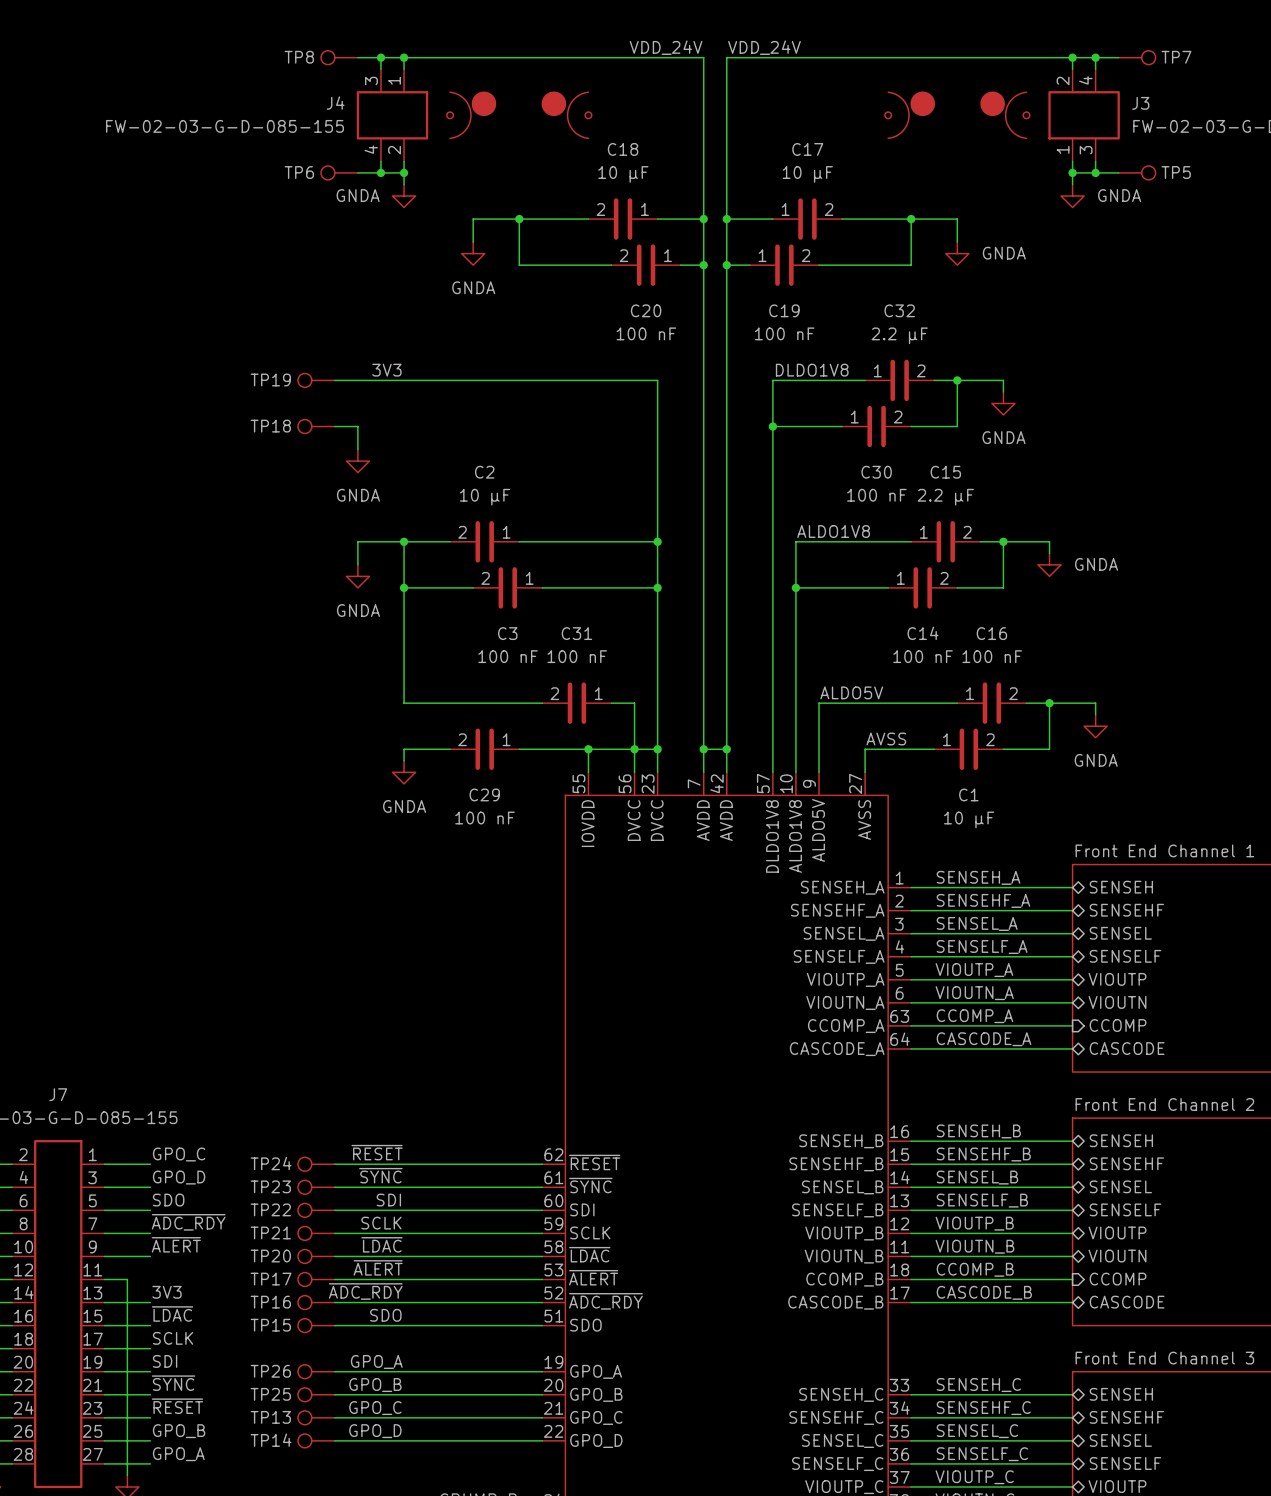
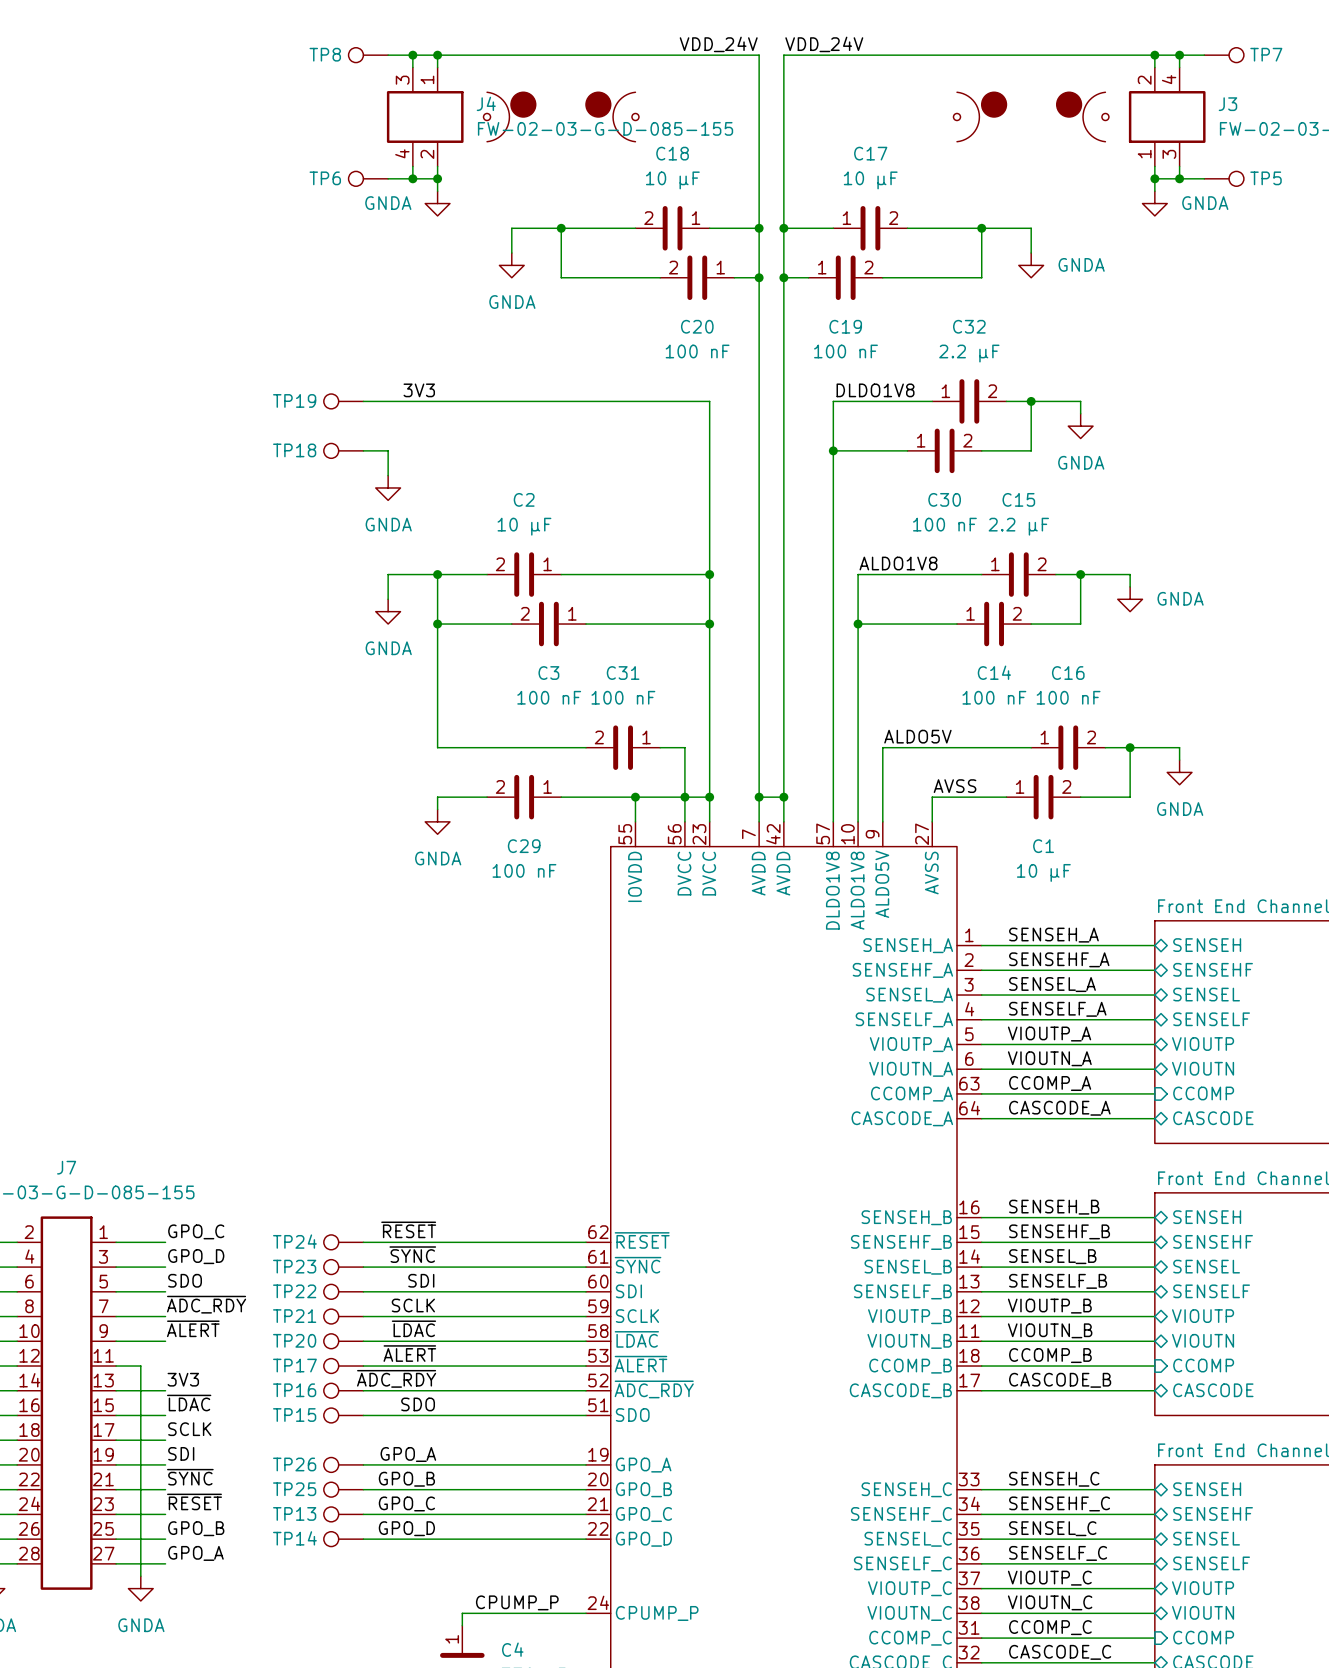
J4 name position: J4 (335, 103) -> J4 (486, 103)
J4 value position: FW-02-03-G-D-085-155 (225, 126) -> FW-02-03-G-D-085-155 (605, 128)

